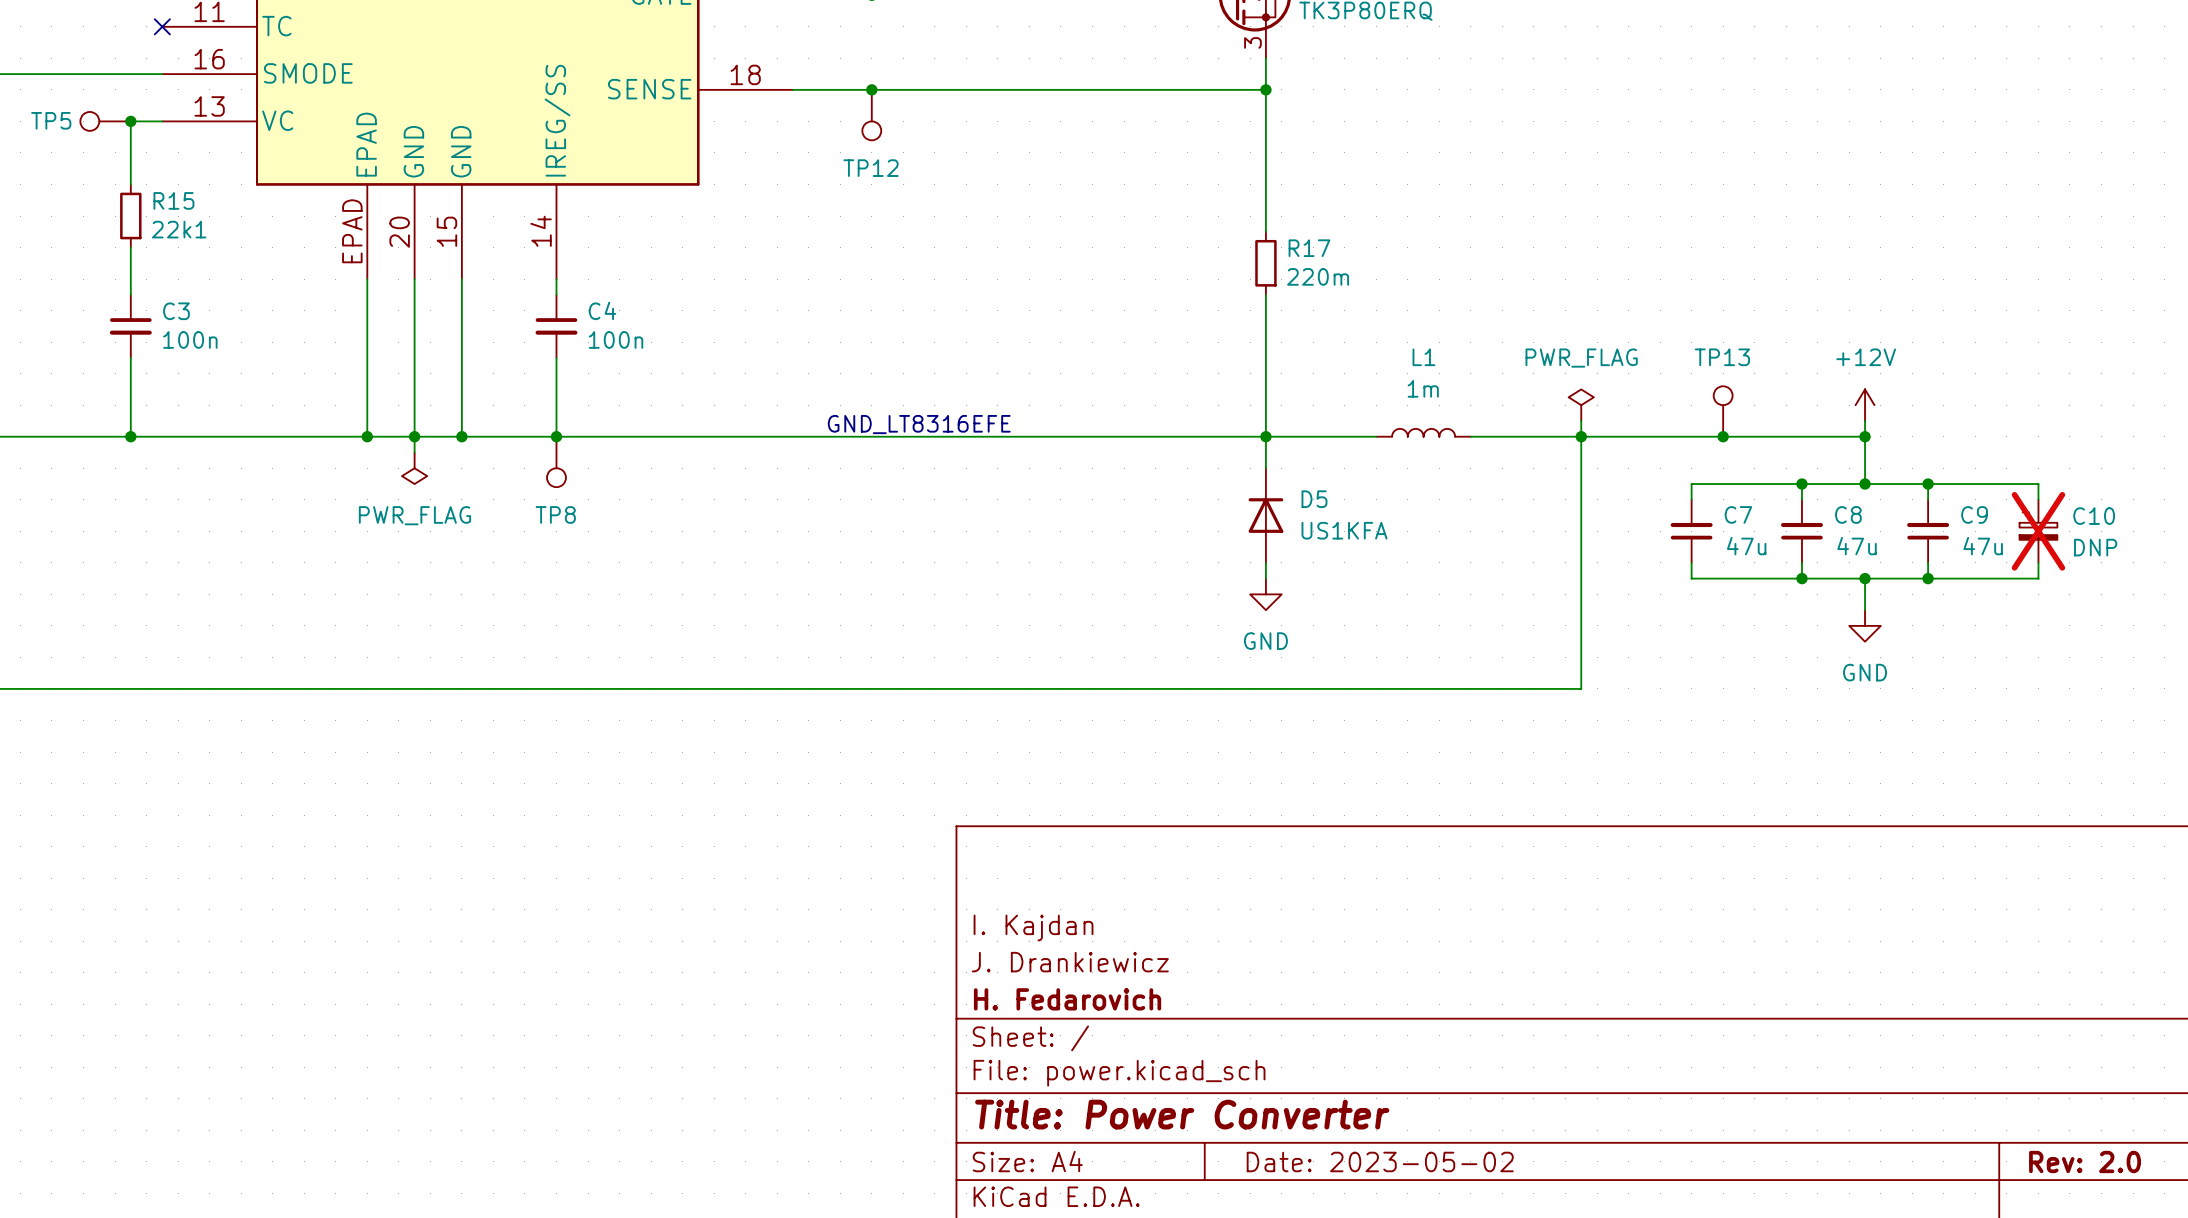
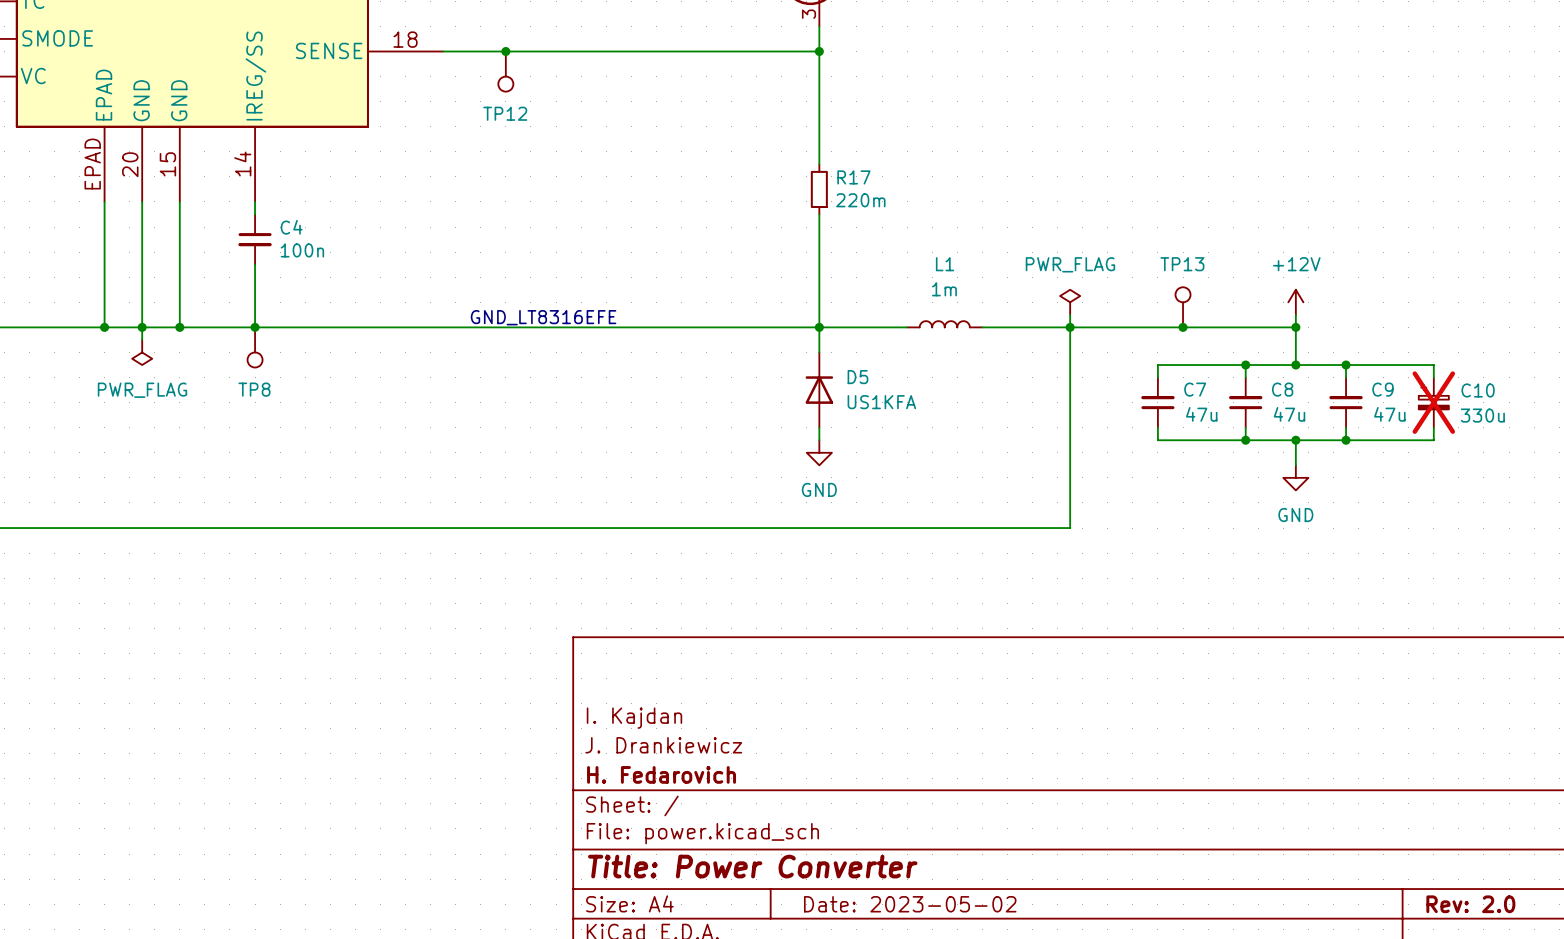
C10 value: DNP (2095, 547) -> 330u (1482, 415)

